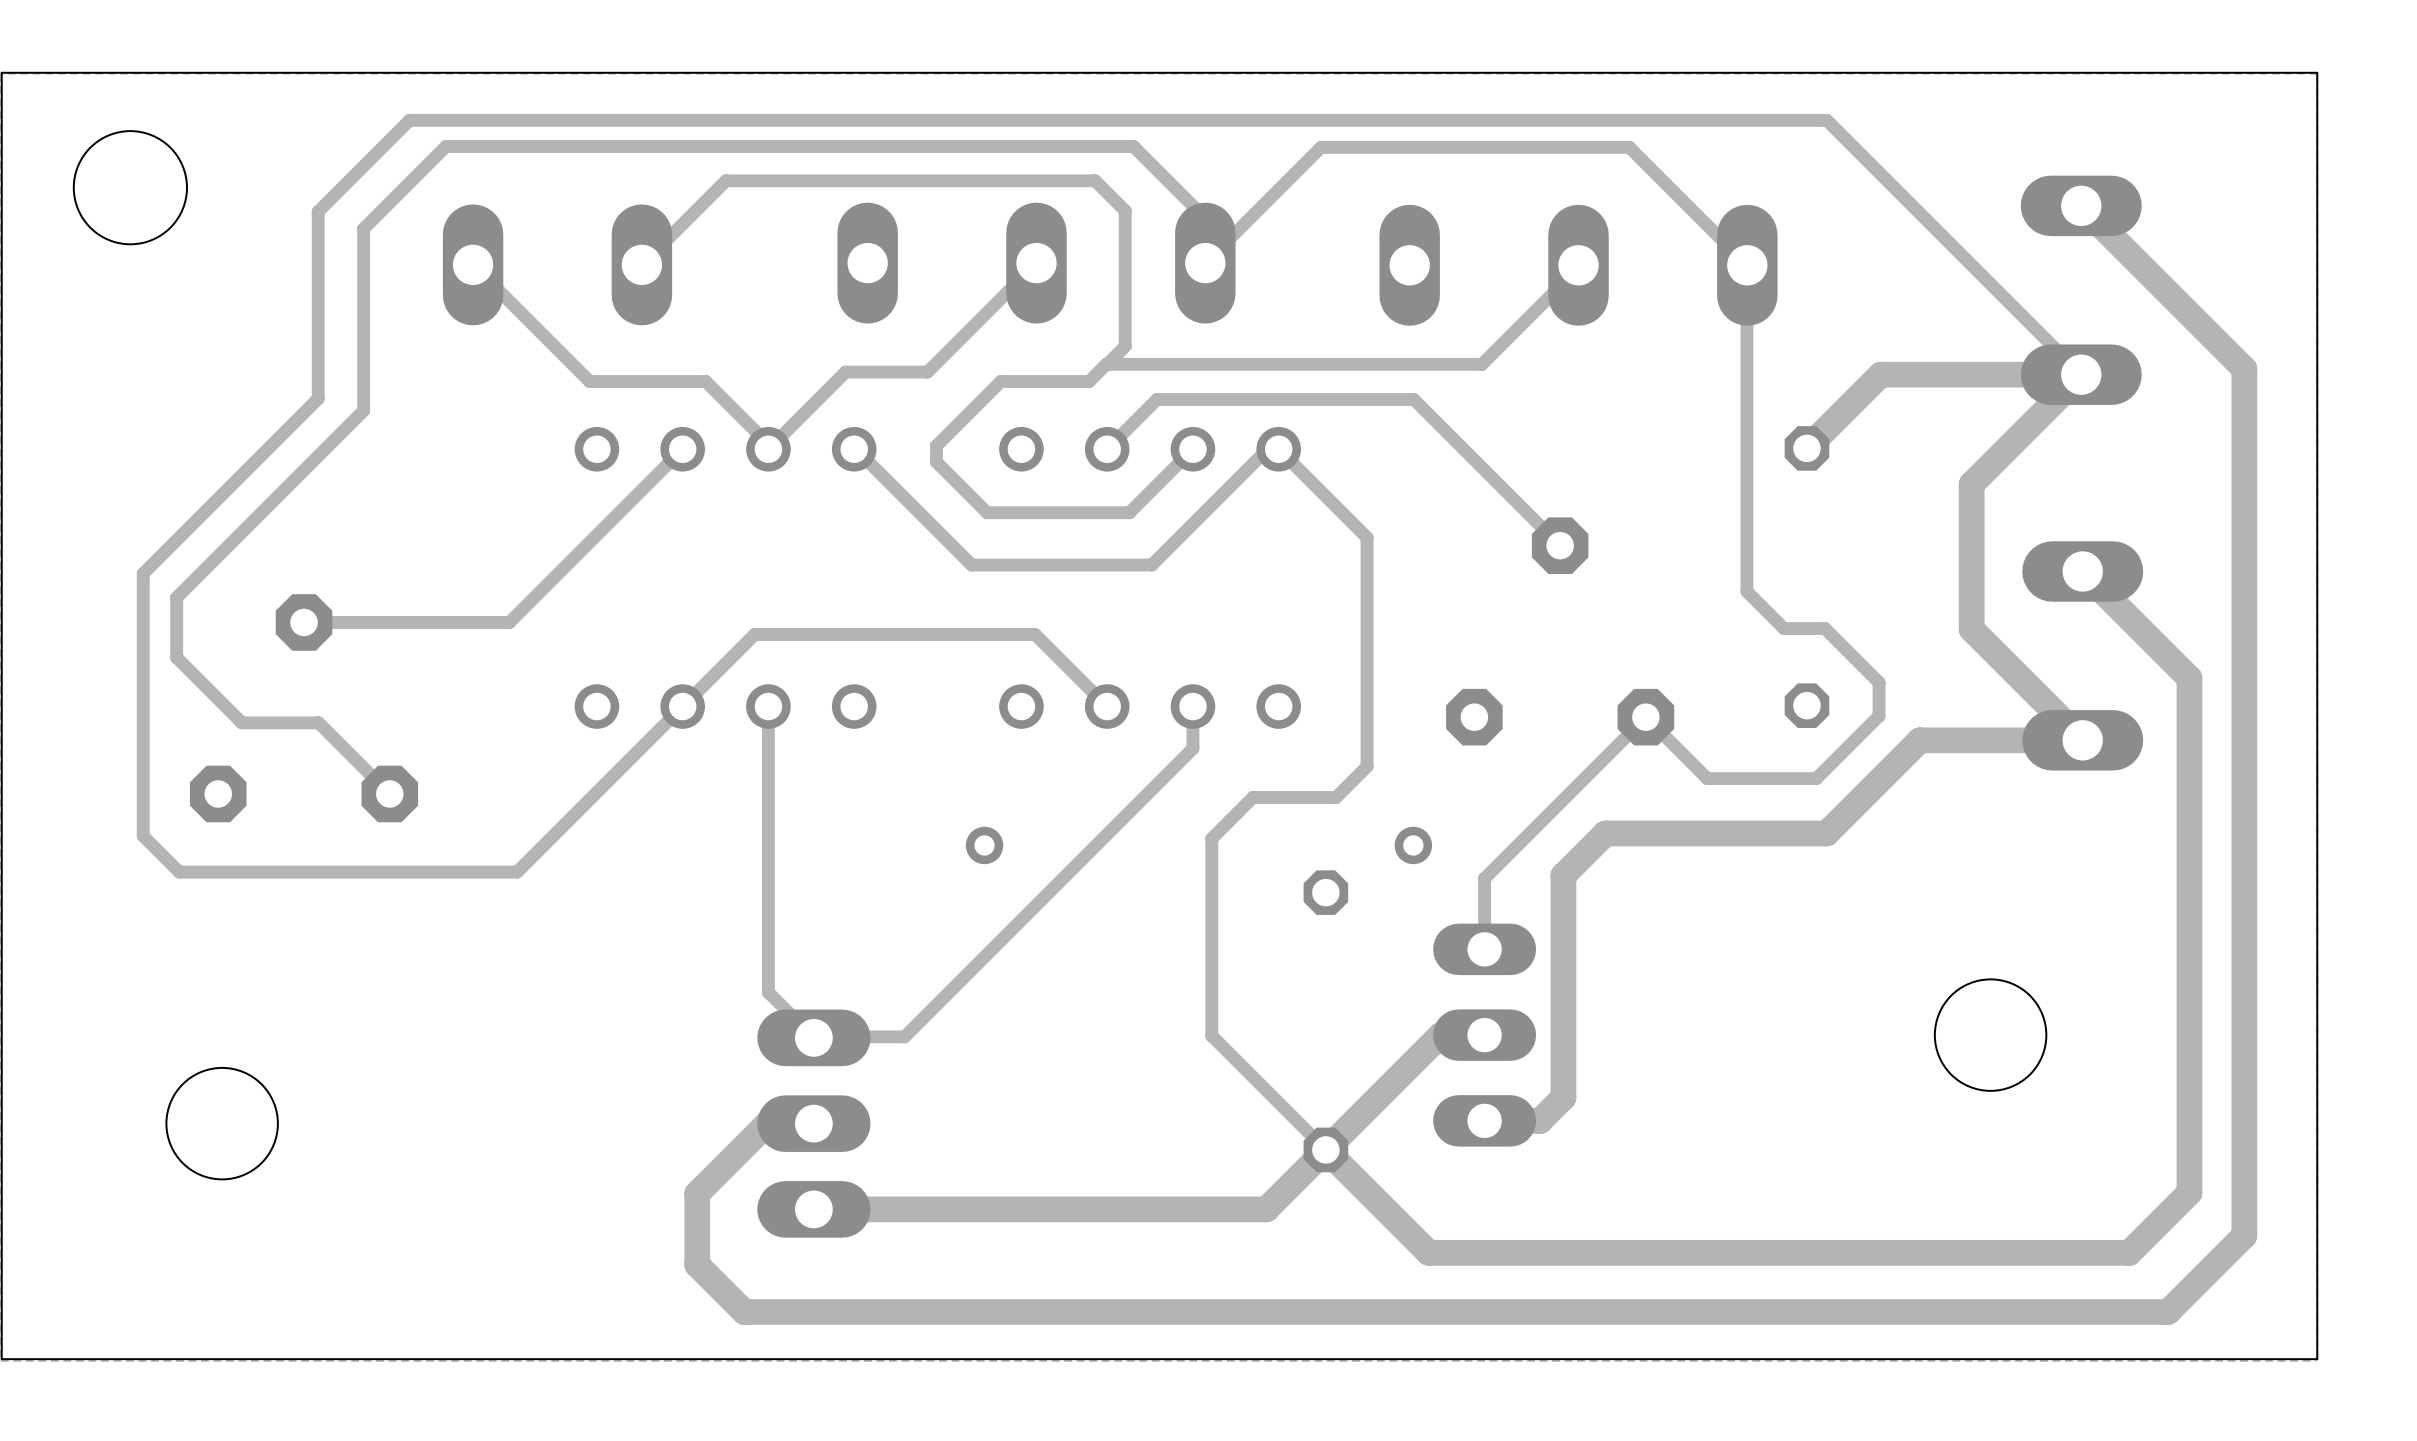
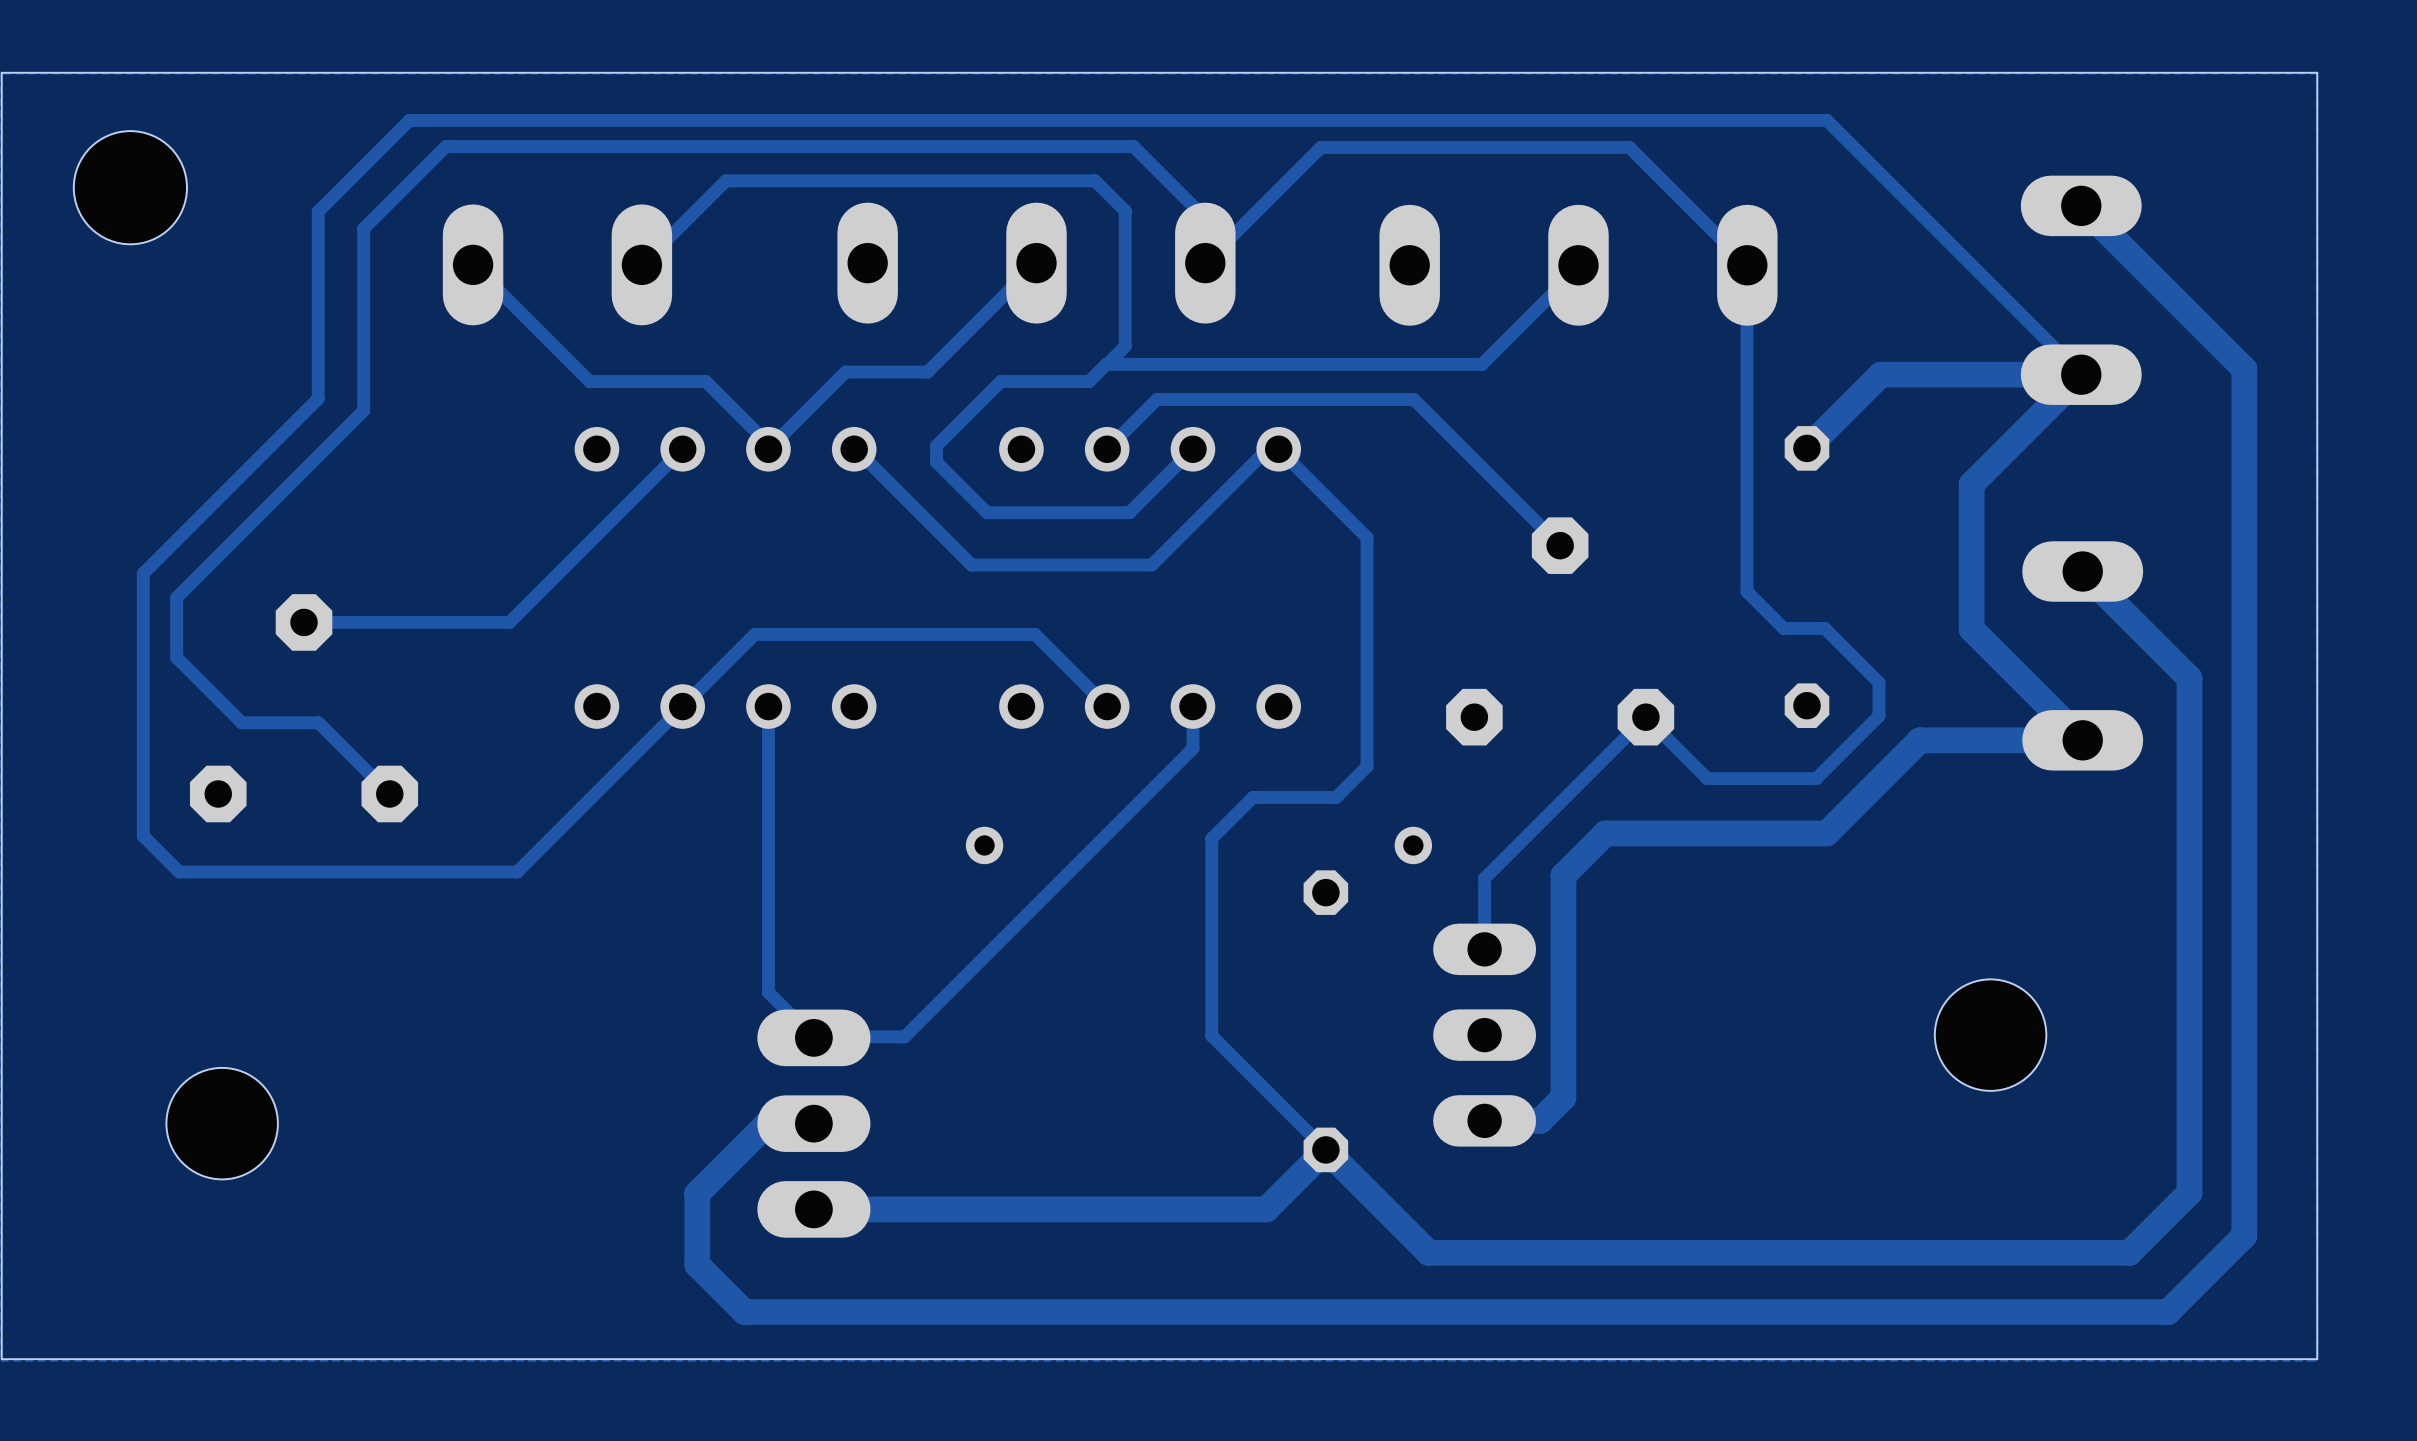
track: (1484, 1035) (1440, 1035) (1325, 1149) -> none

